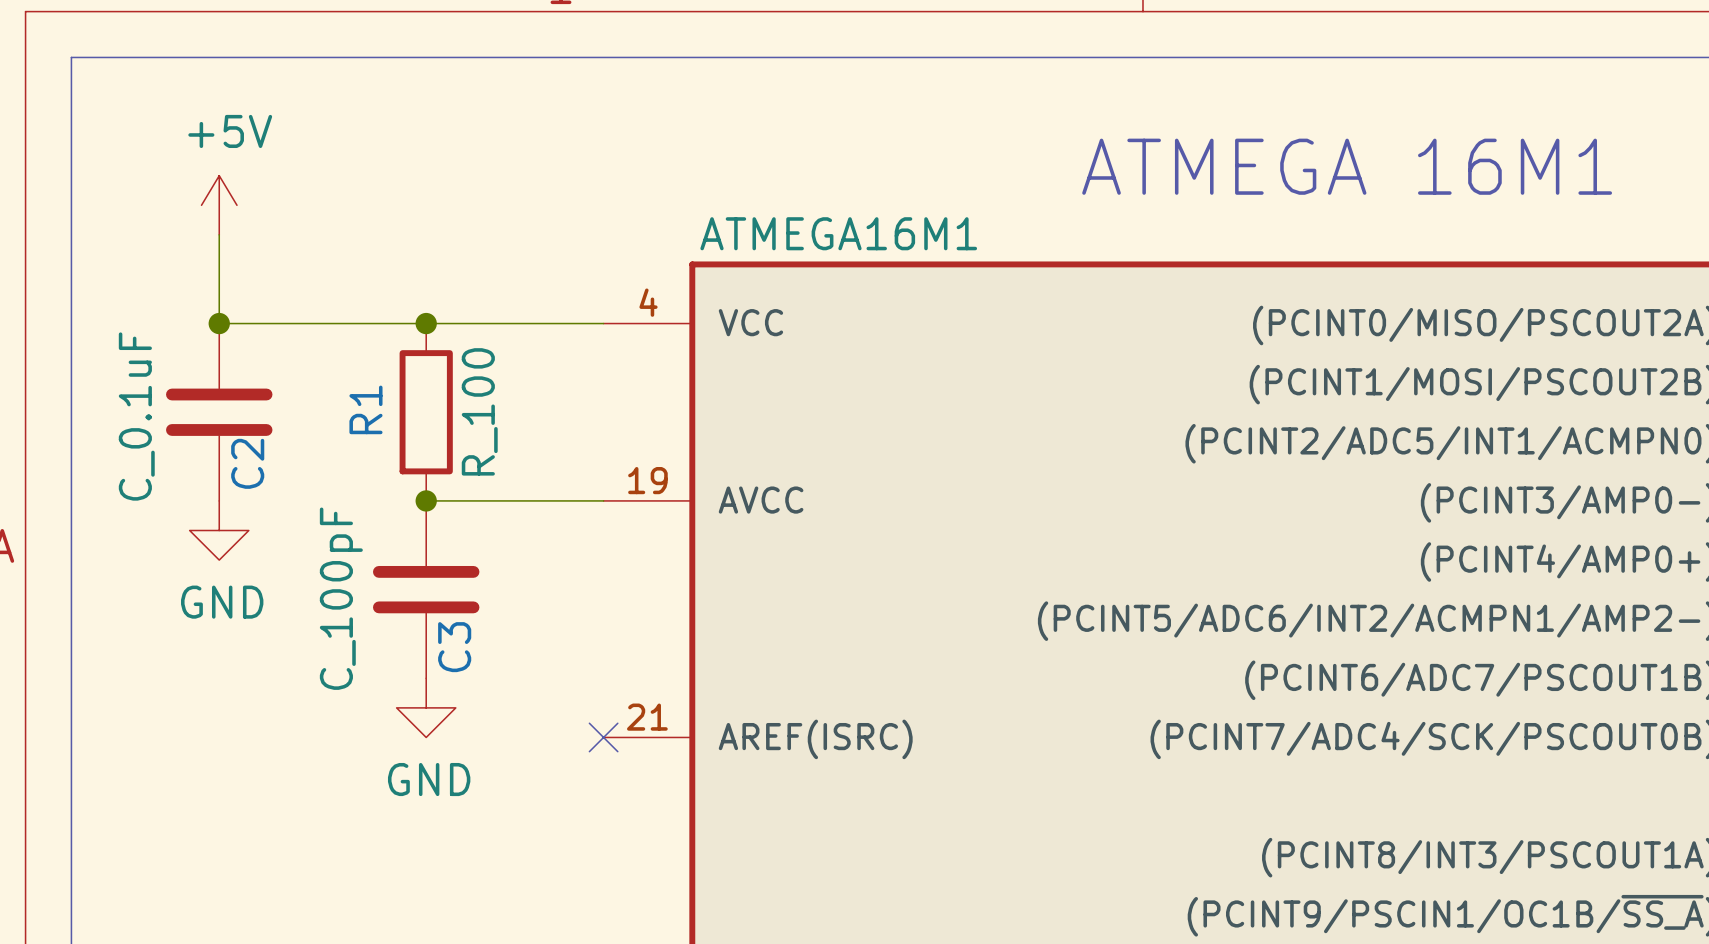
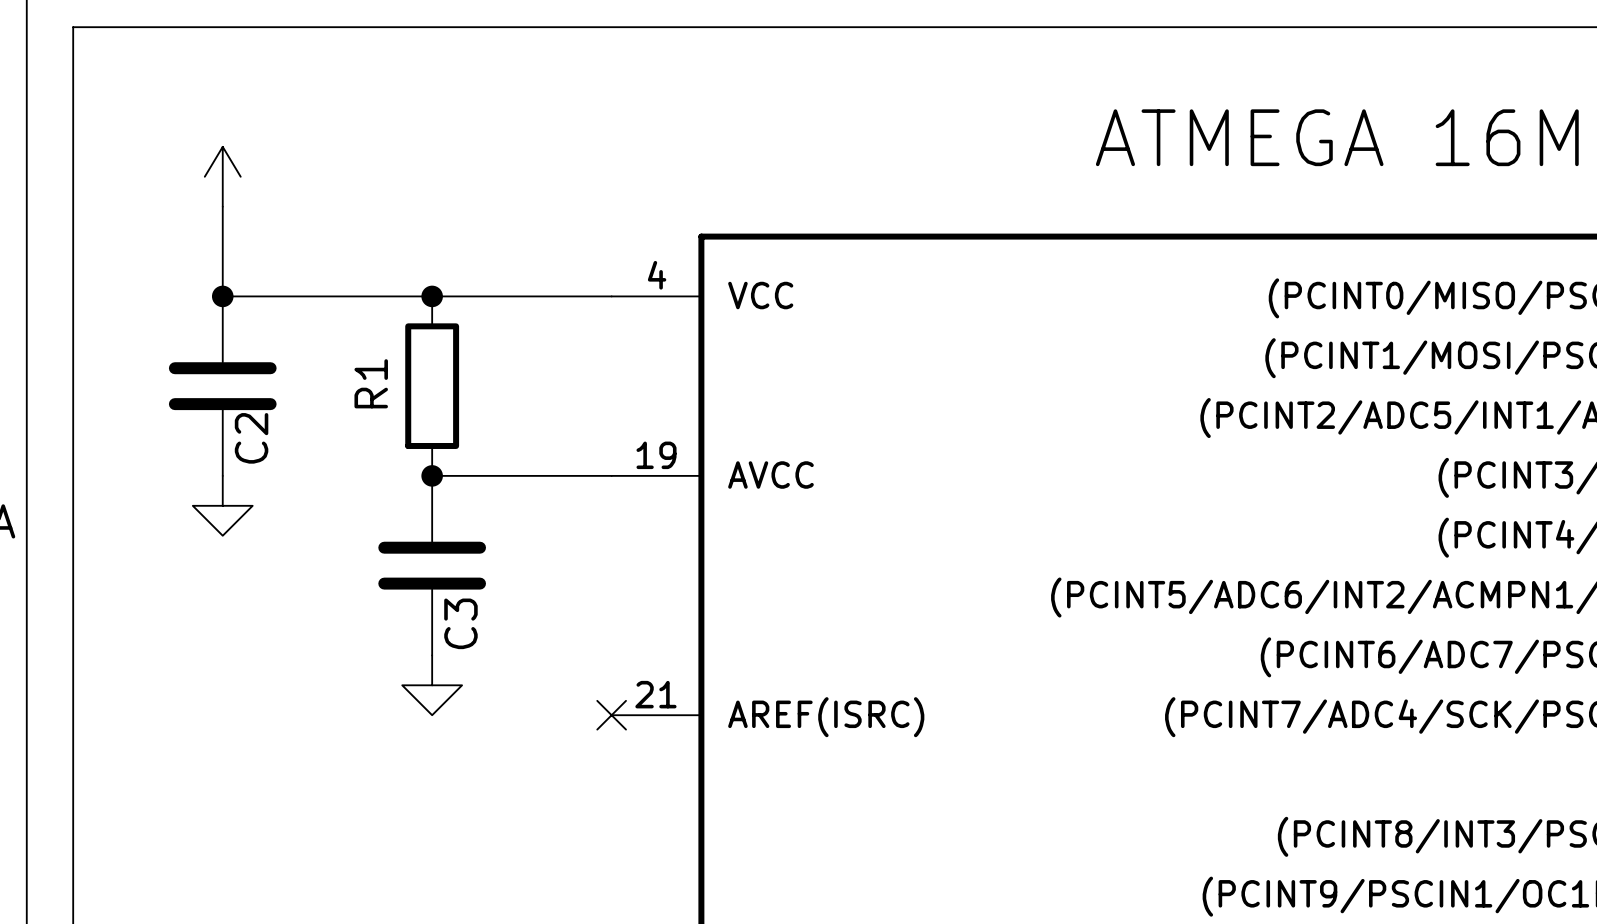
power symbol text: +5V (230, 131) -> none
part value: ATMEGA16M1 (838, 233) -> none
R1 value: R_100 (479, 411) -> none
C2 value: C_0.1uF (136, 416) -> none
C3 value: C_100pF (341, 598) -> none
power symbol text: GND (222, 602) -> none
power symbol text: GND (429, 779) -> none

